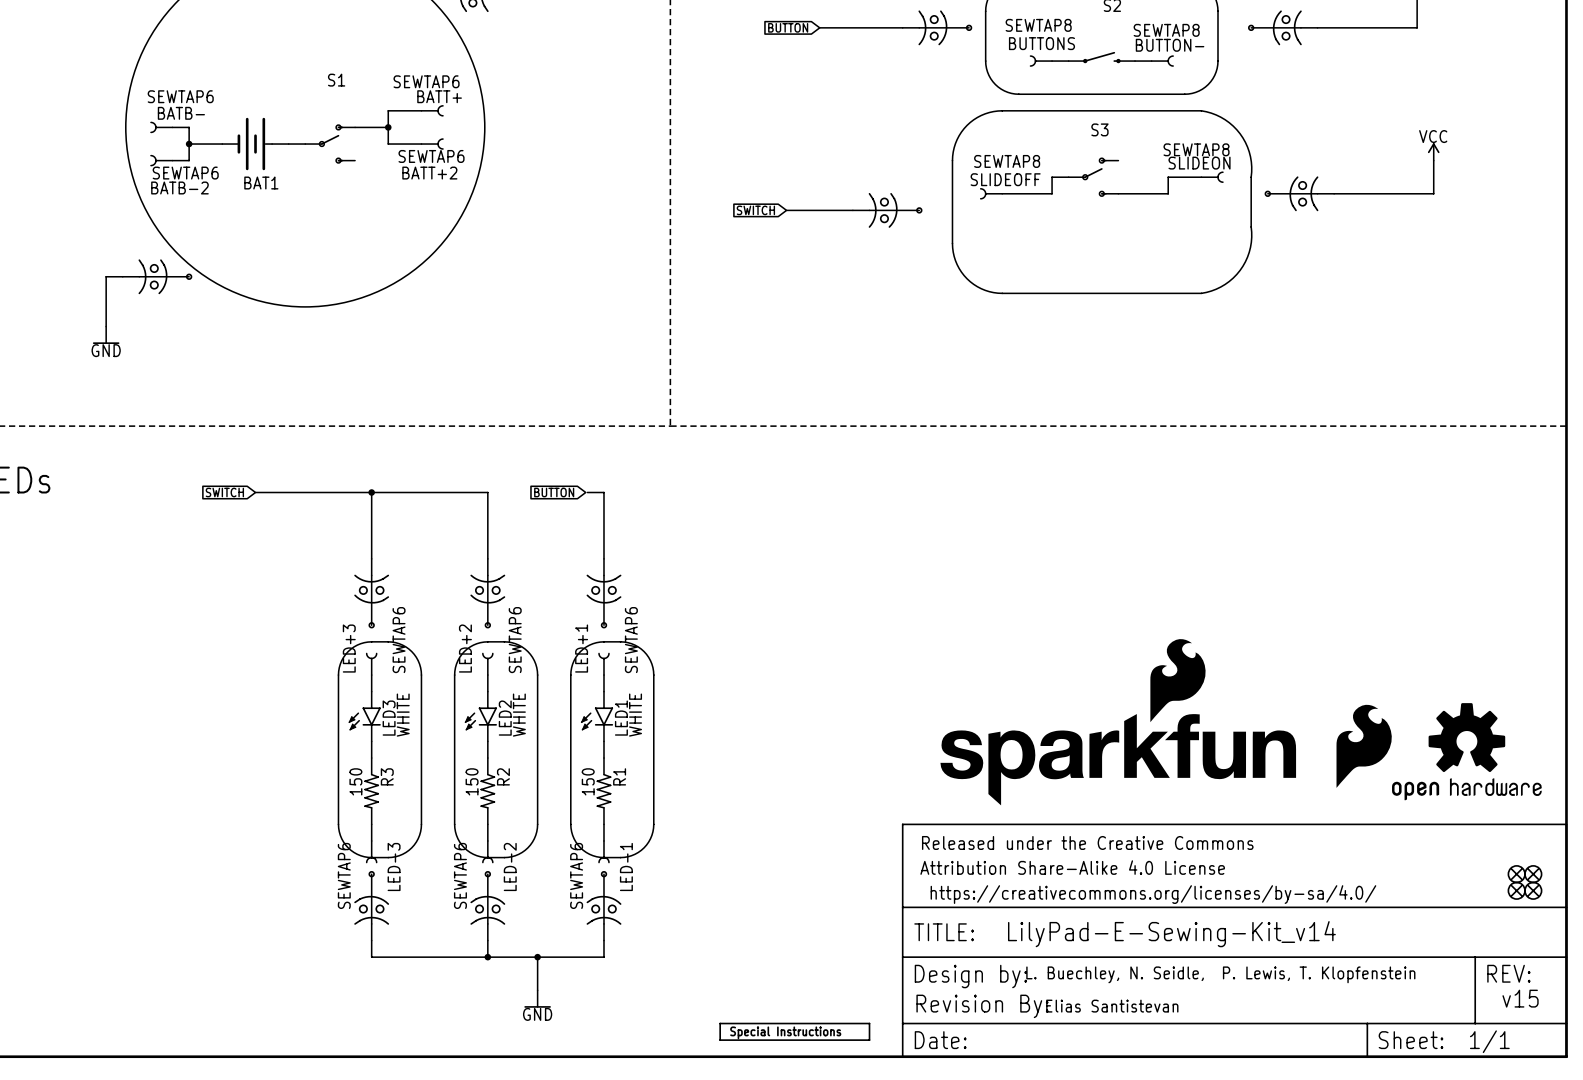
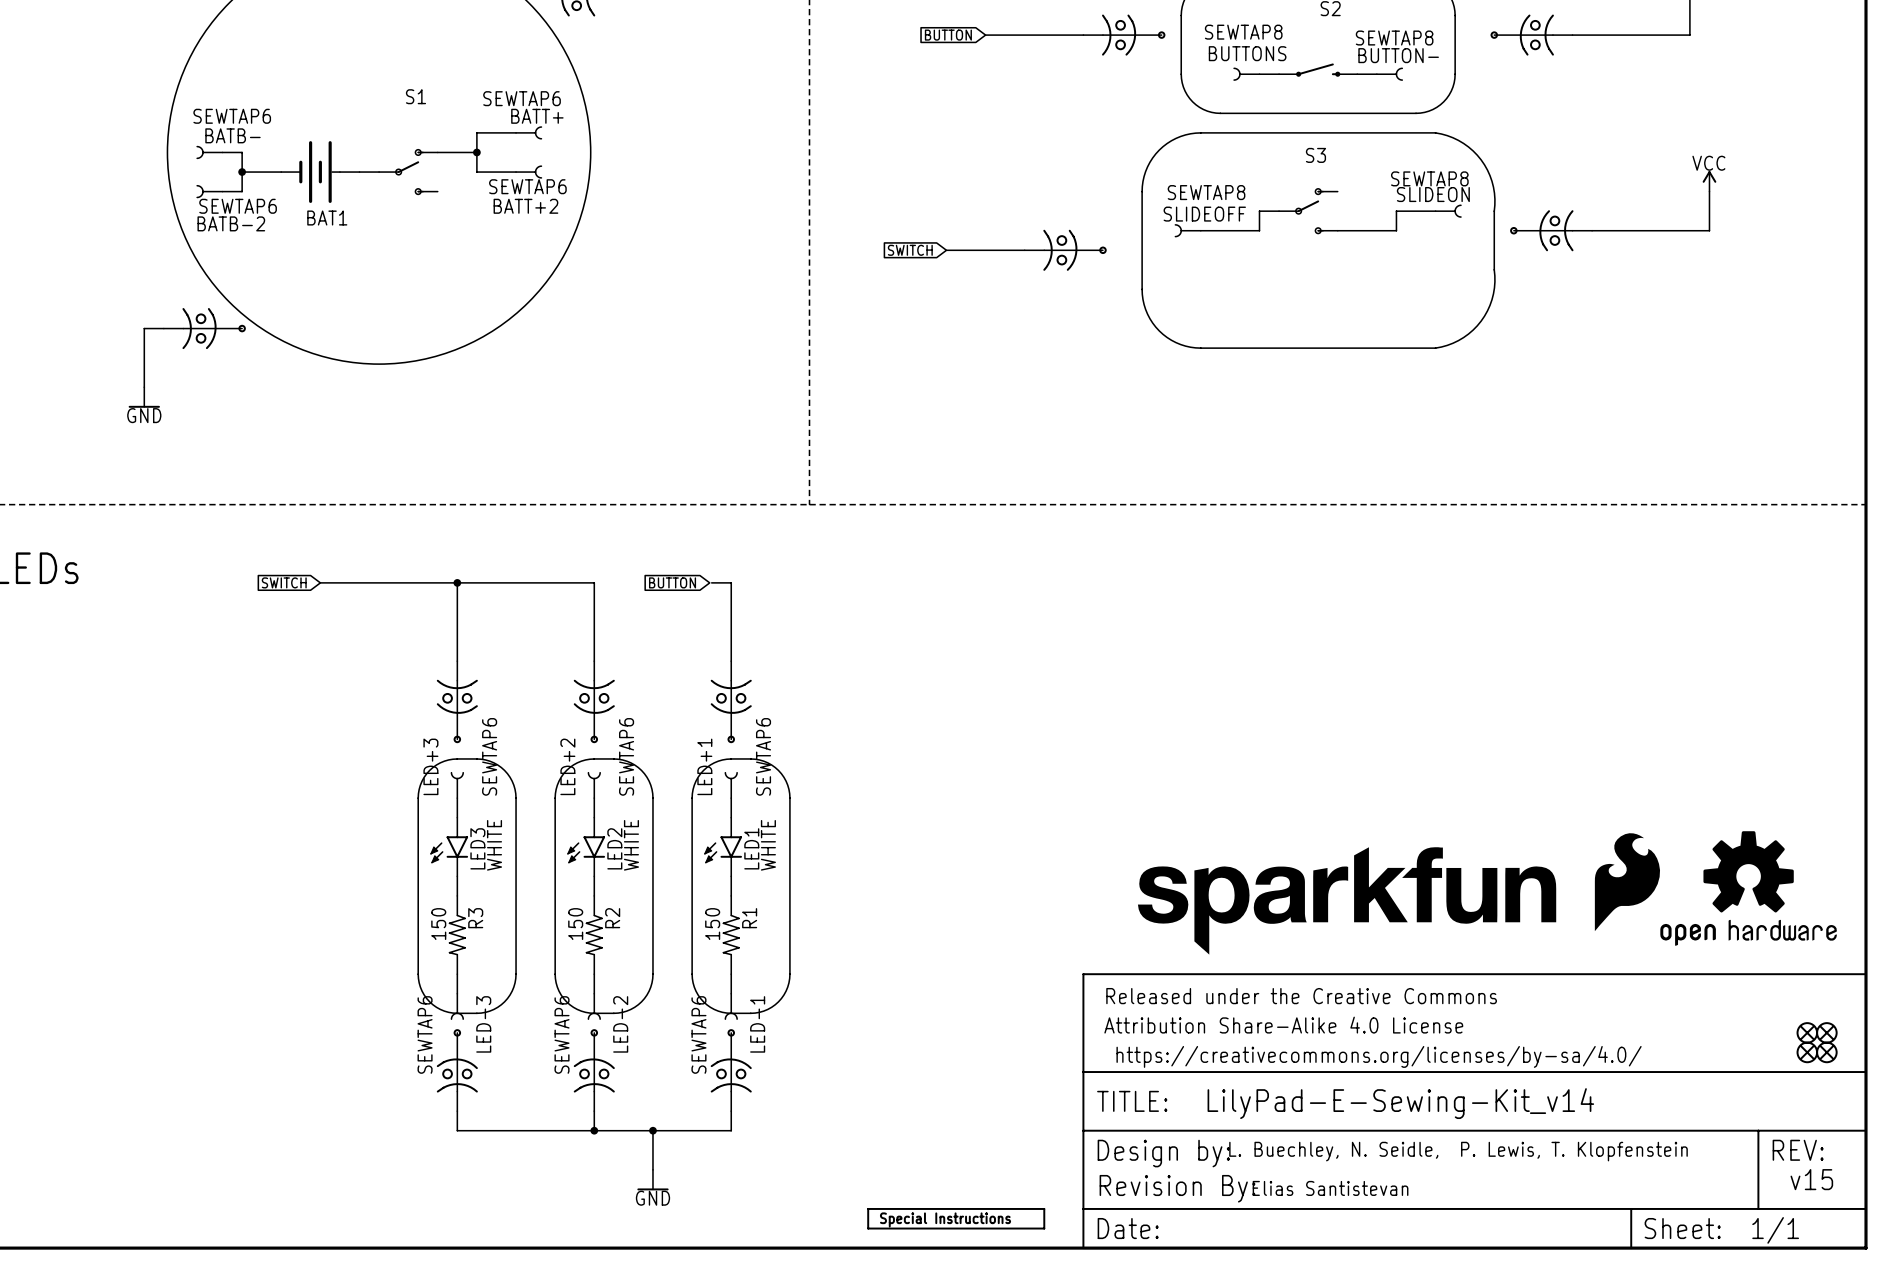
part: (1118, 722) -> none
part: none -> (1347, 900)

